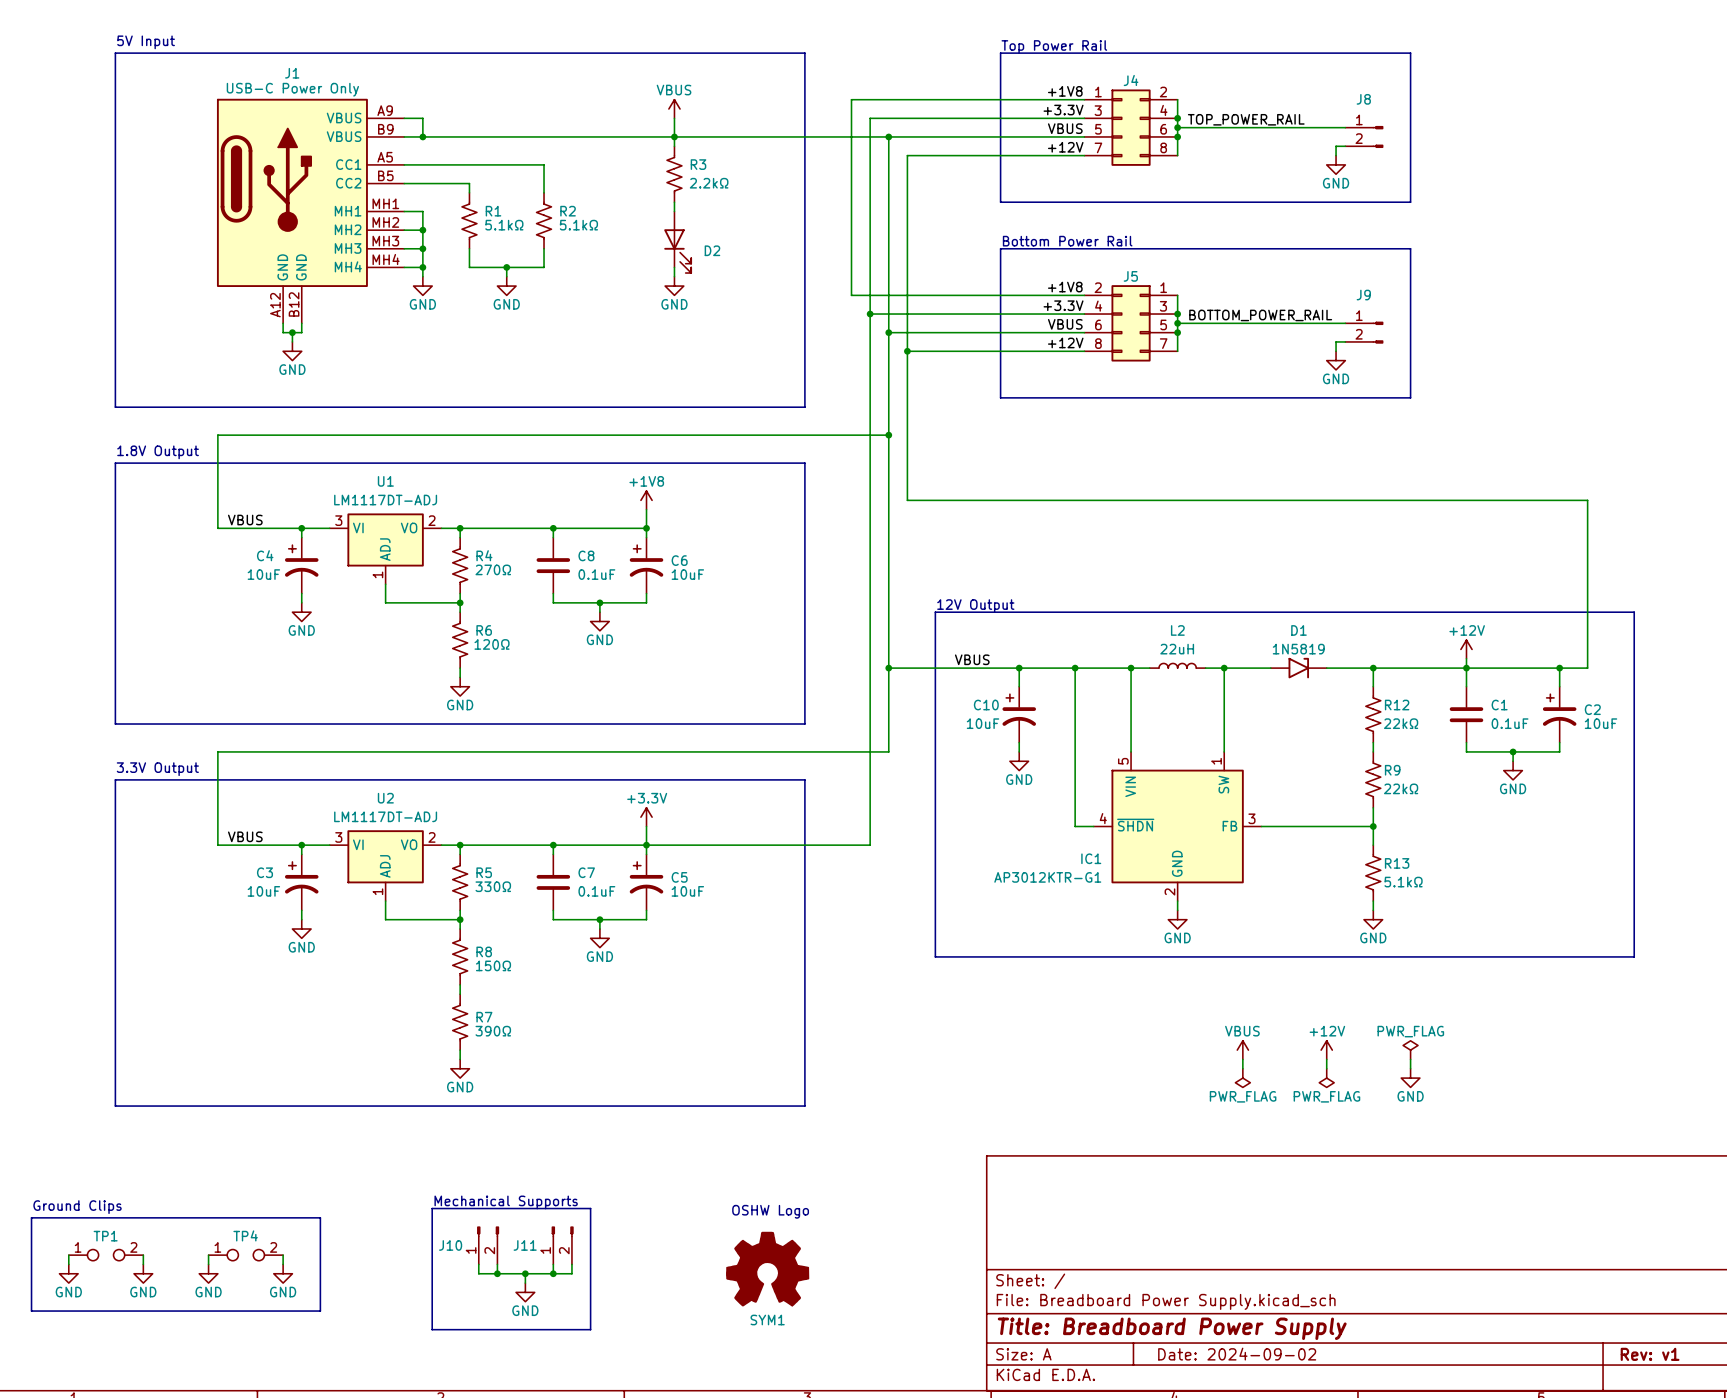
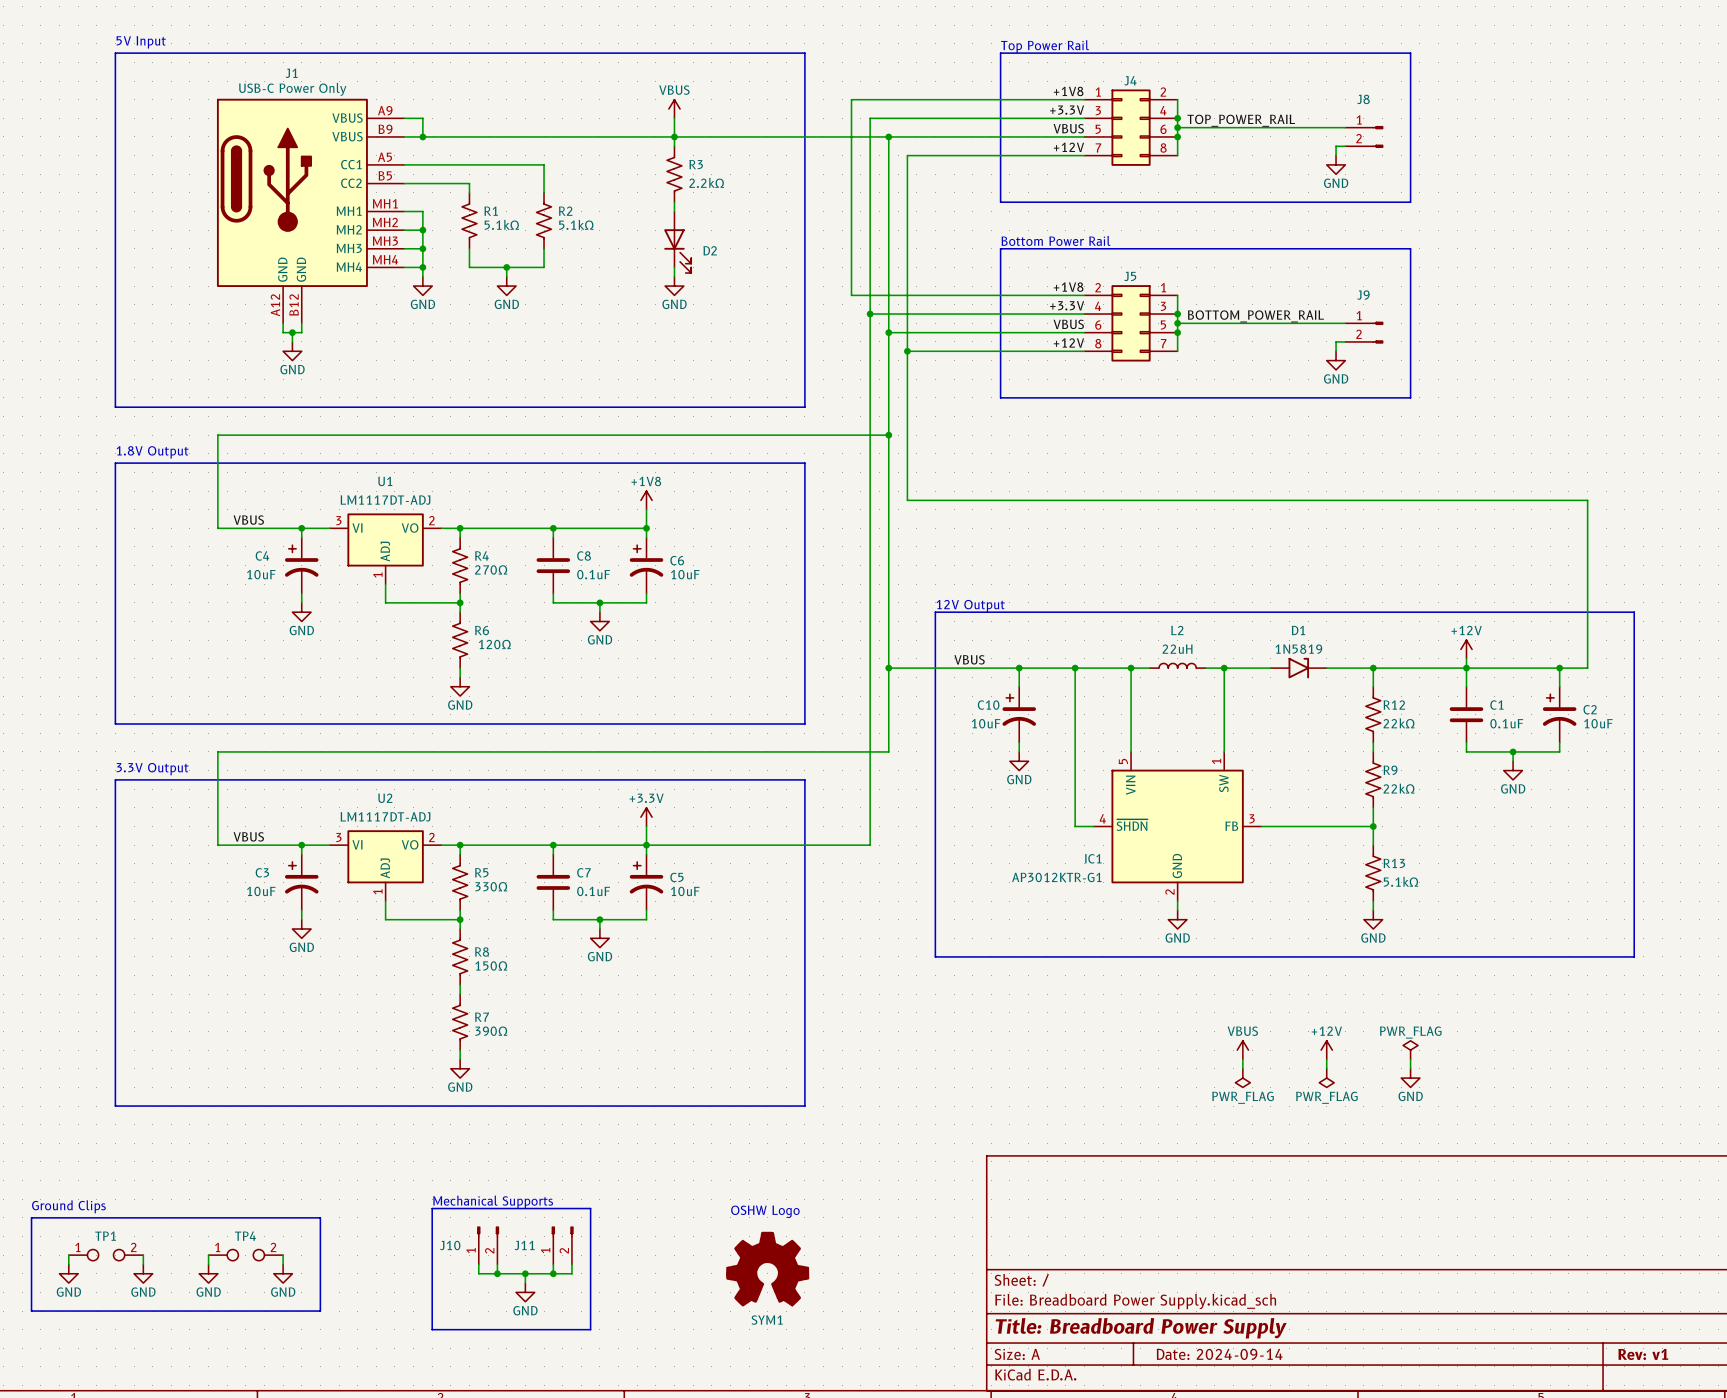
title block: Date: 2024-09-02 (1237, 1354) -> Date: 2024-09-14 (1219, 1354)

